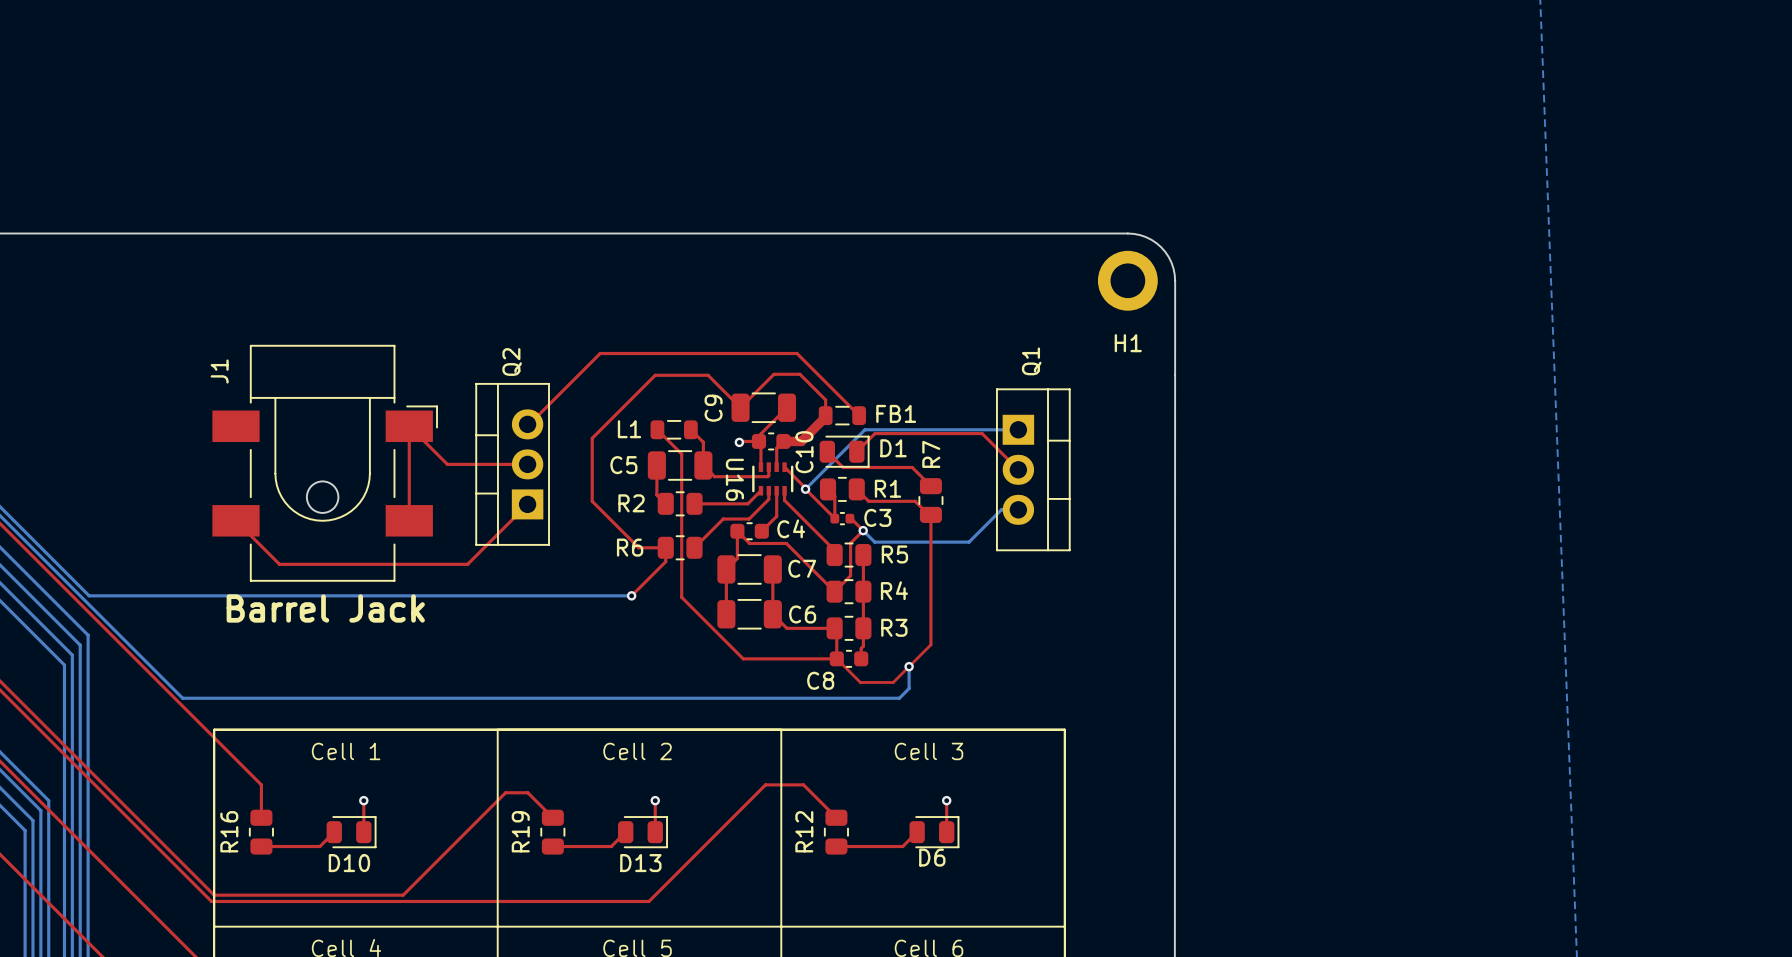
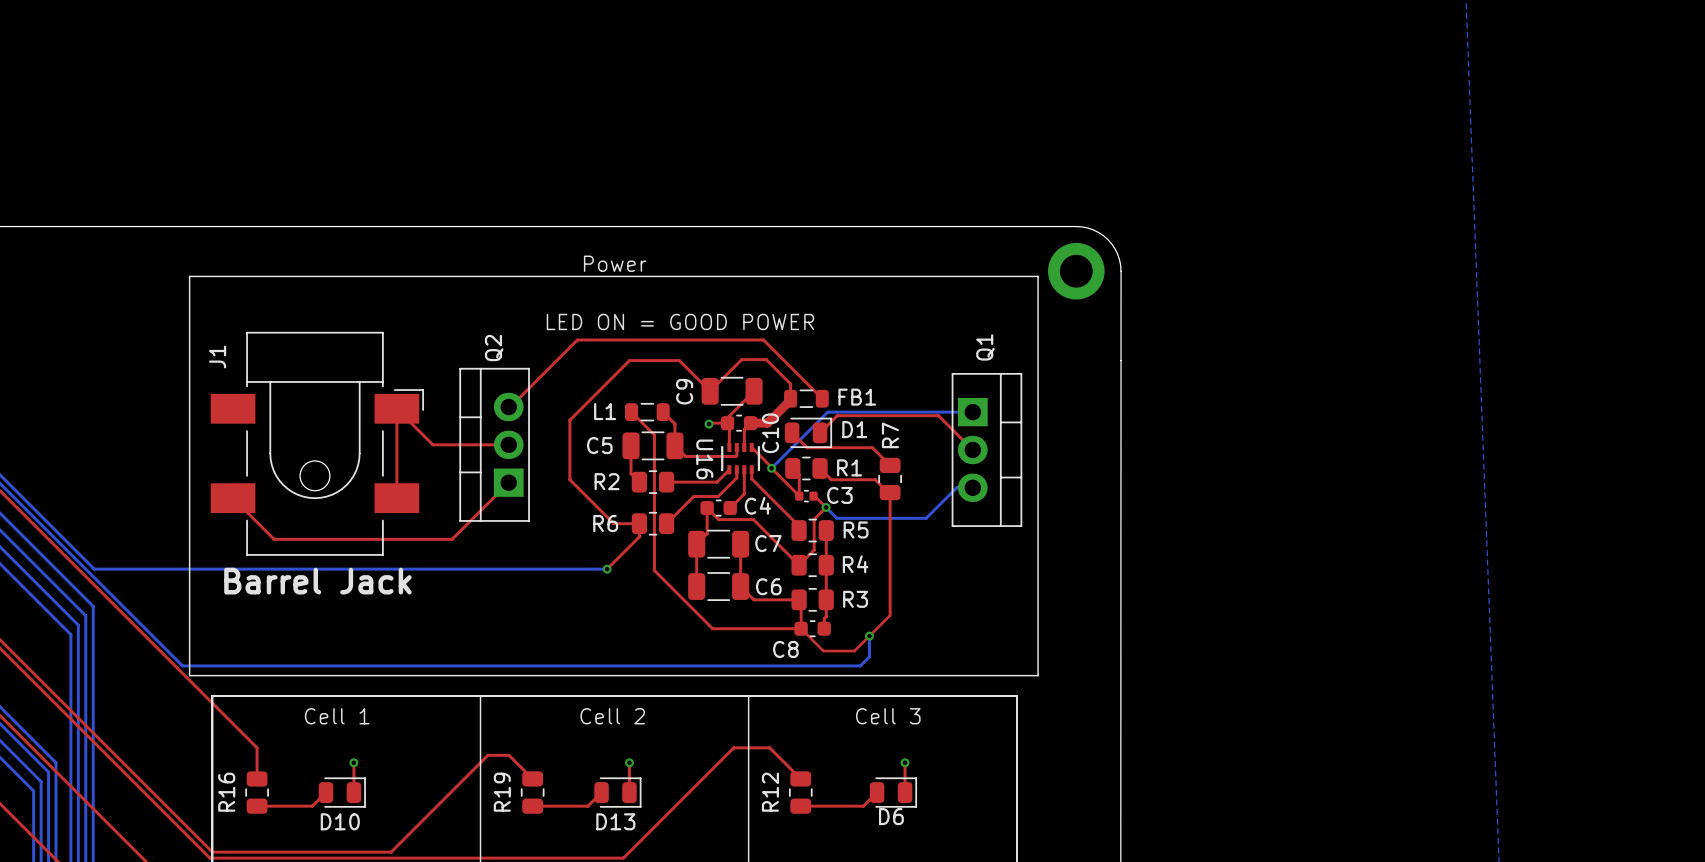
text: none -> Power (615, 263)
line: none -> (189, 276) (1038, 276) (1038, 675) (189, 675) (189, 276)
text: none -> LED ON = GOOD POWER (680, 321)
H1 name: H1 (1128, 343) -> none

